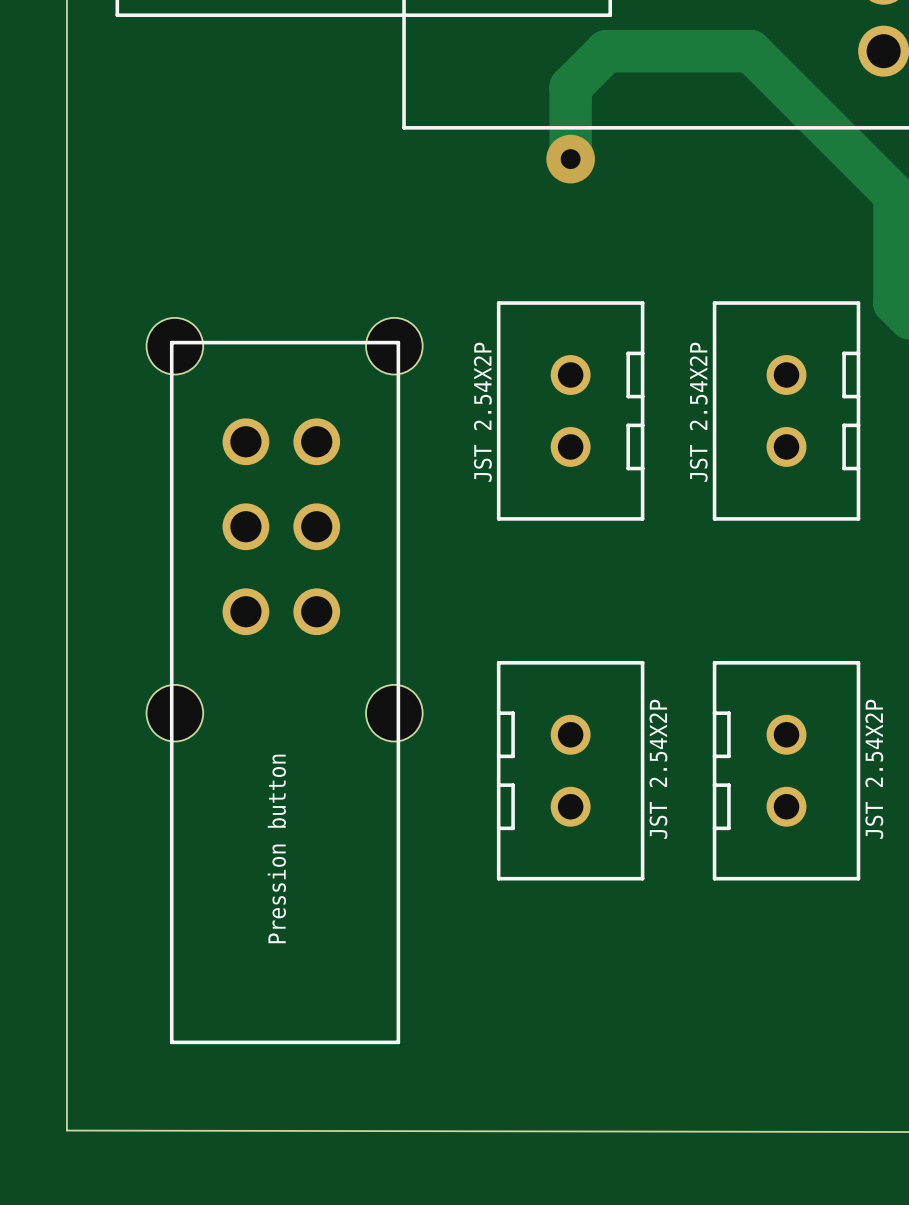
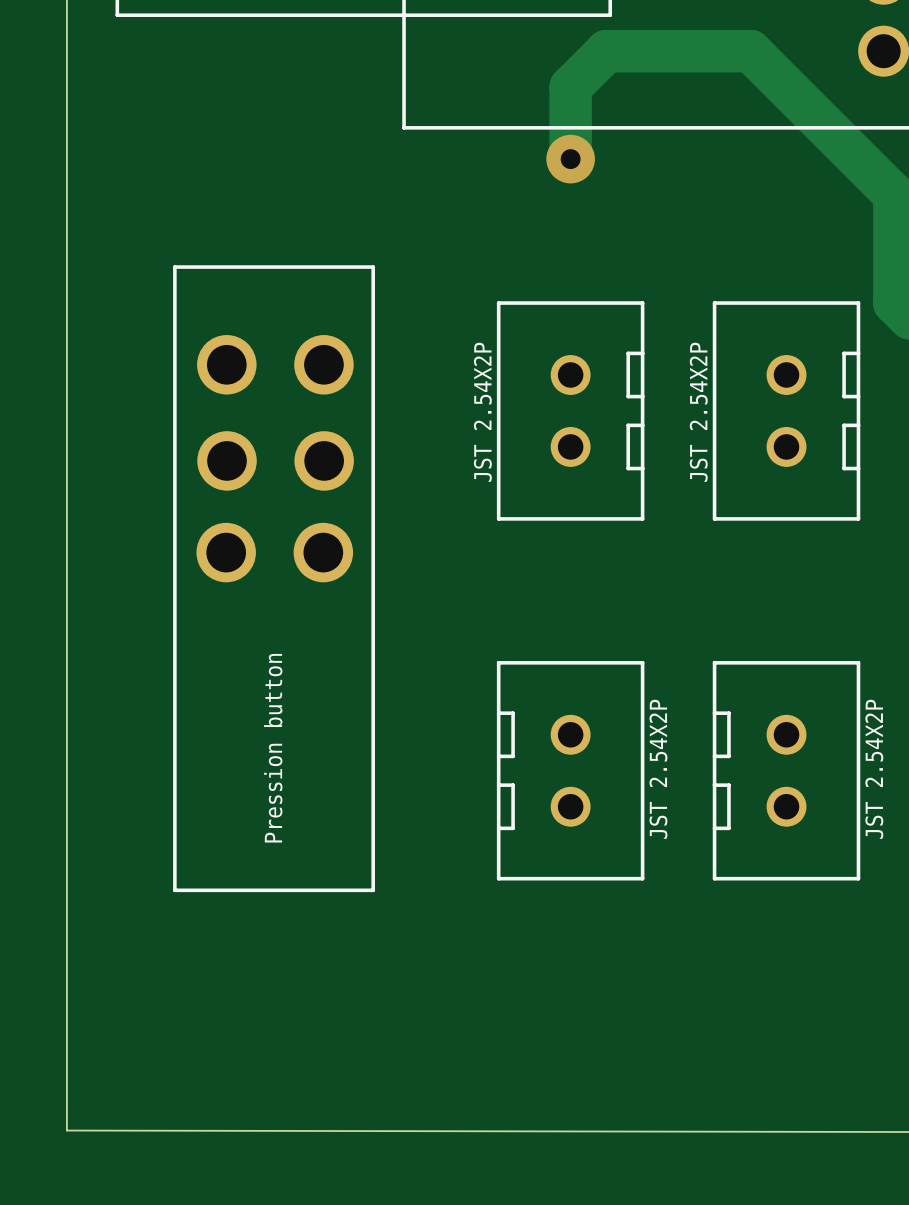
part: none -> (274, 578)
part: (284, 681) -> none

